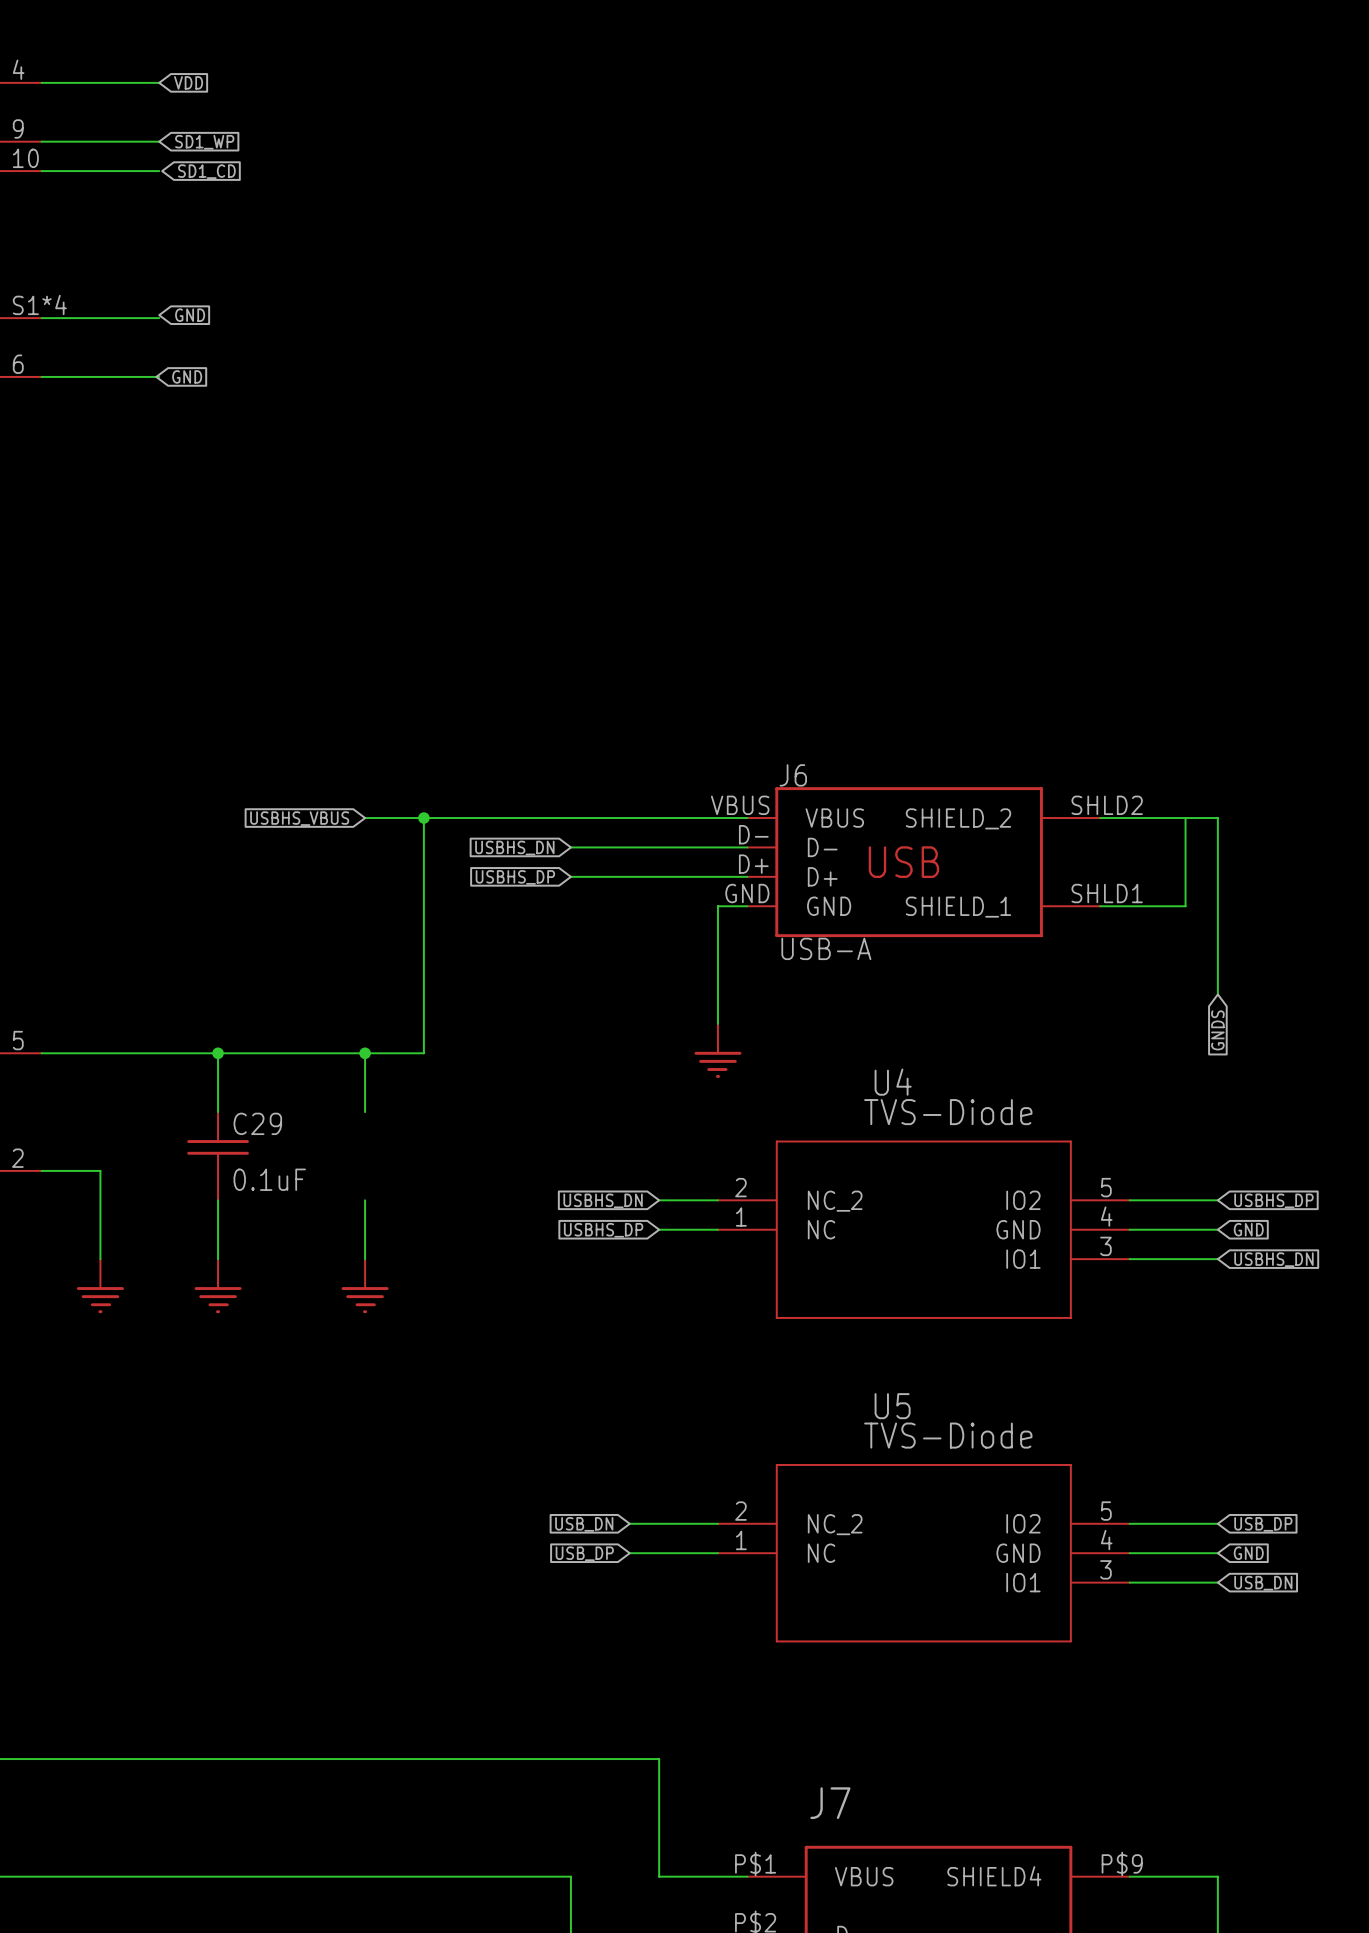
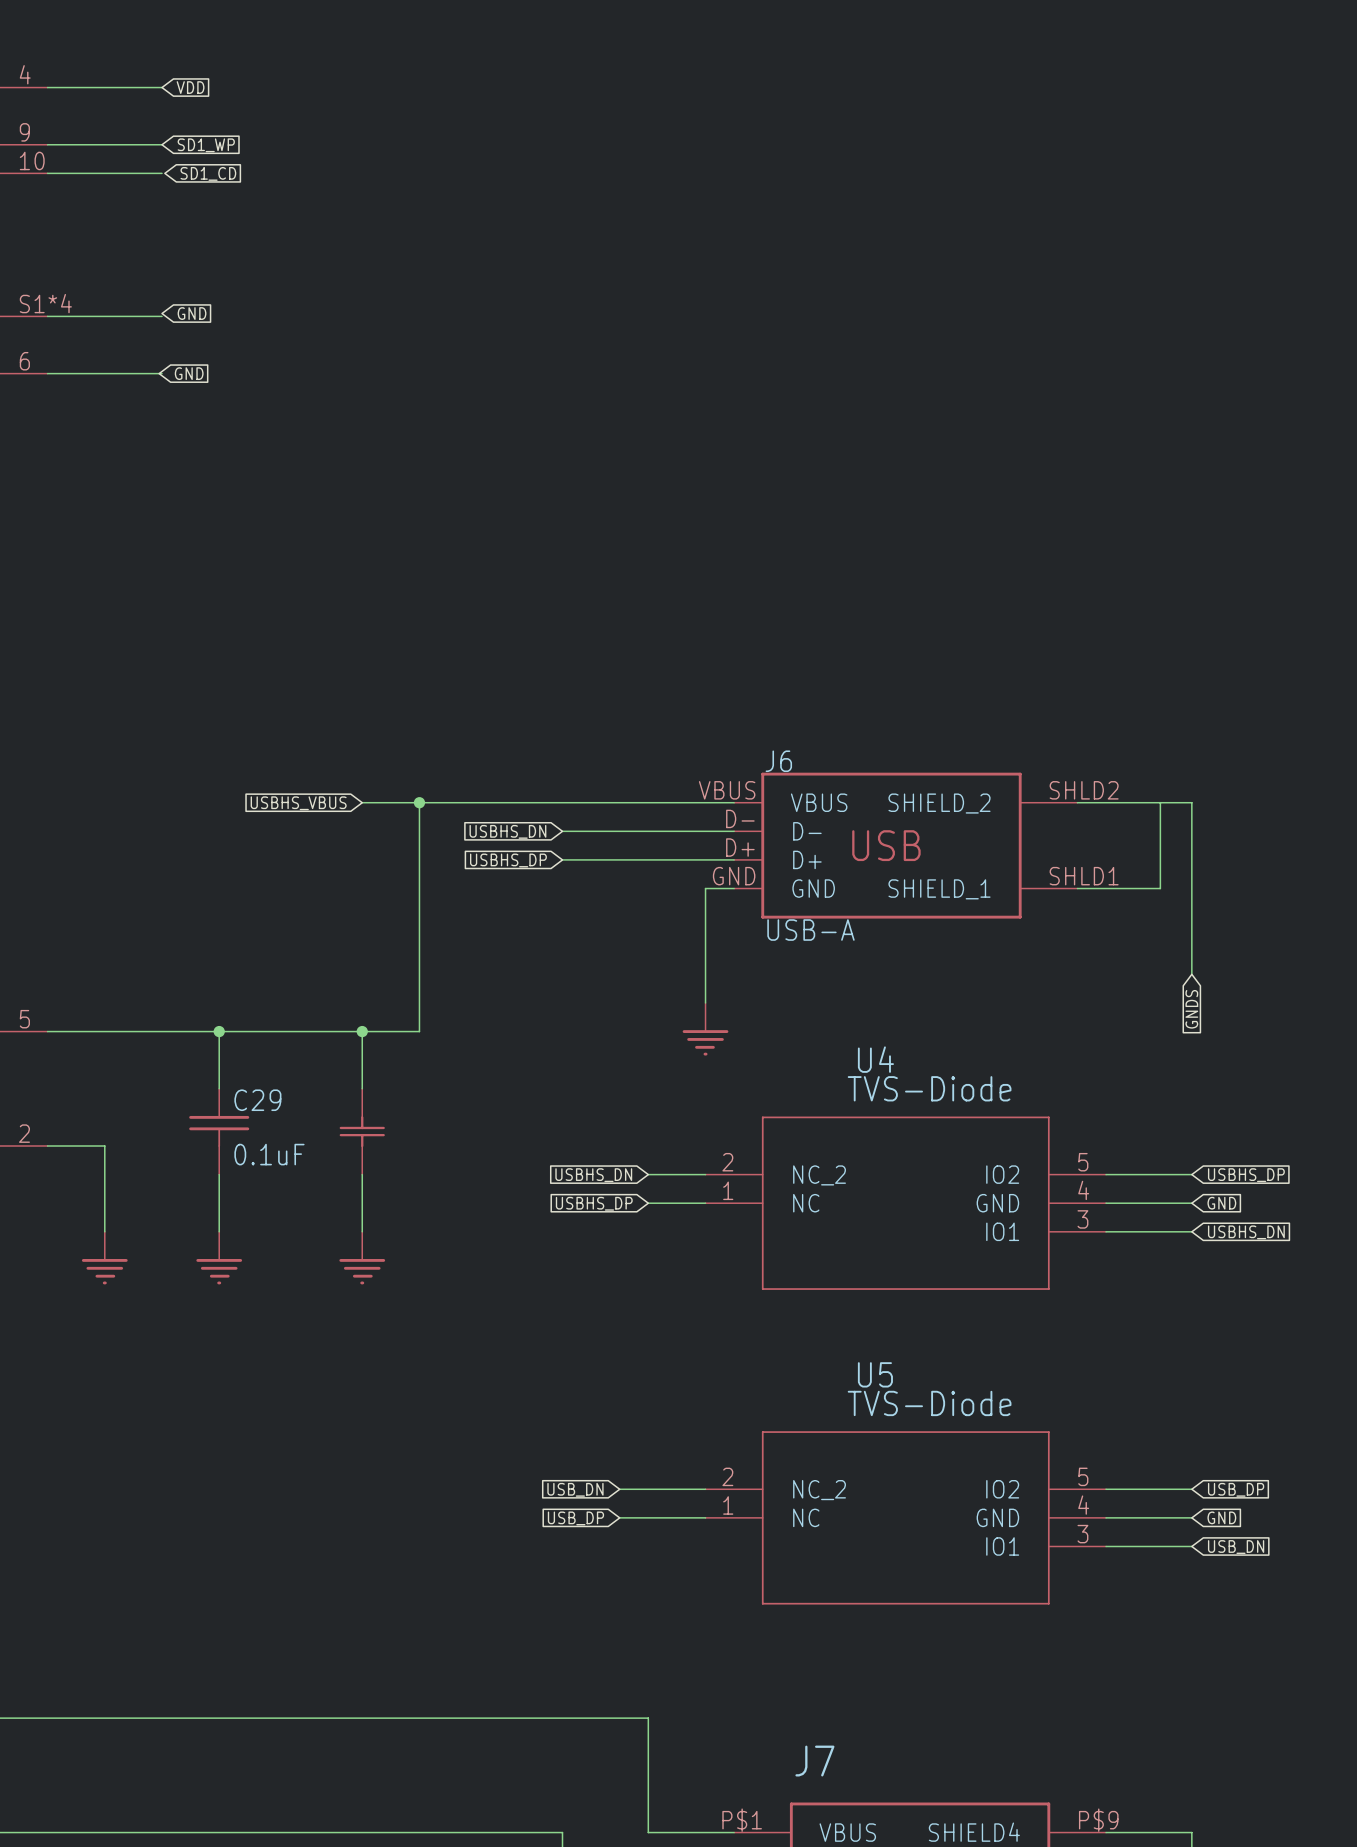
part: none -> (362, 1131)

